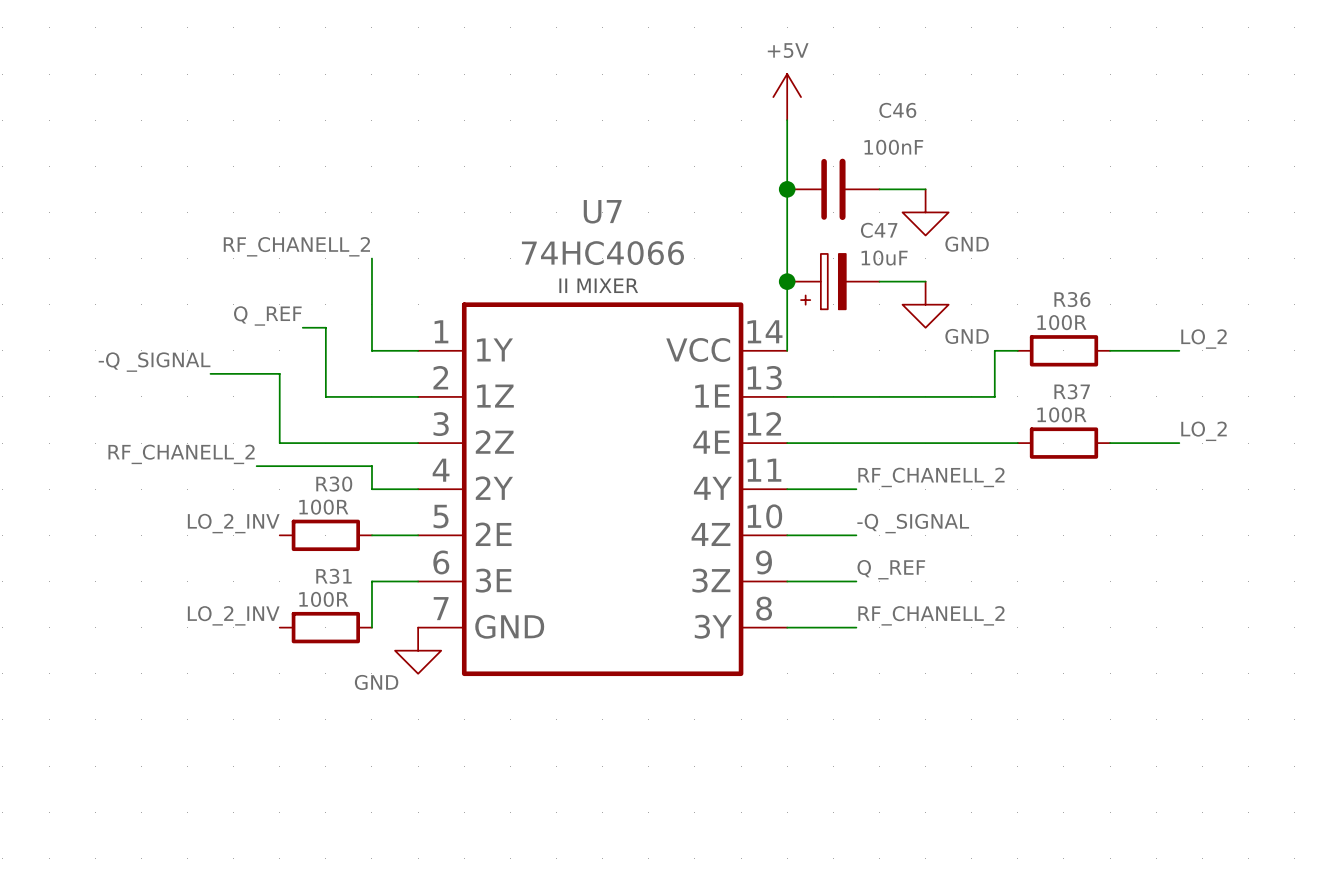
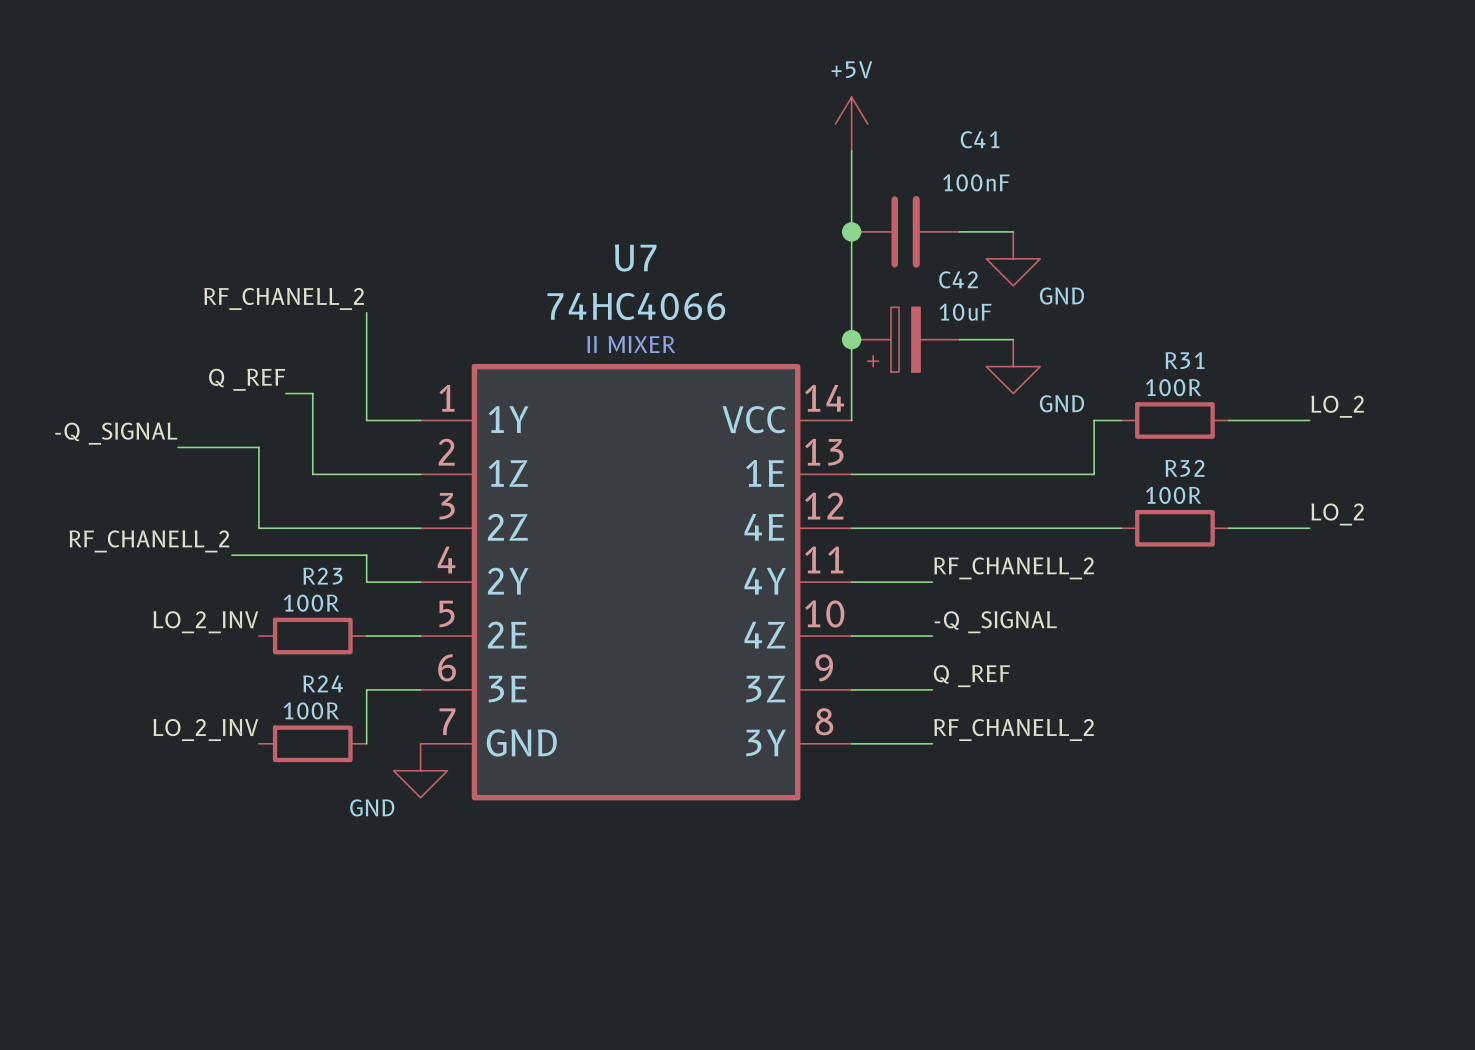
C46 name: C46 (897, 110) -> C41 (980, 139)
C47 name: C47 (879, 230) -> C42 (958, 279)
R36 name: R36 (1072, 299) -> R31 (1184, 360)
R37 name: R37 (1072, 391) -> R32 (1185, 468)
R30 name: R30 (334, 484) -> R23 (322, 576)
R31 name: R31 (333, 576) -> R24 (323, 683)

